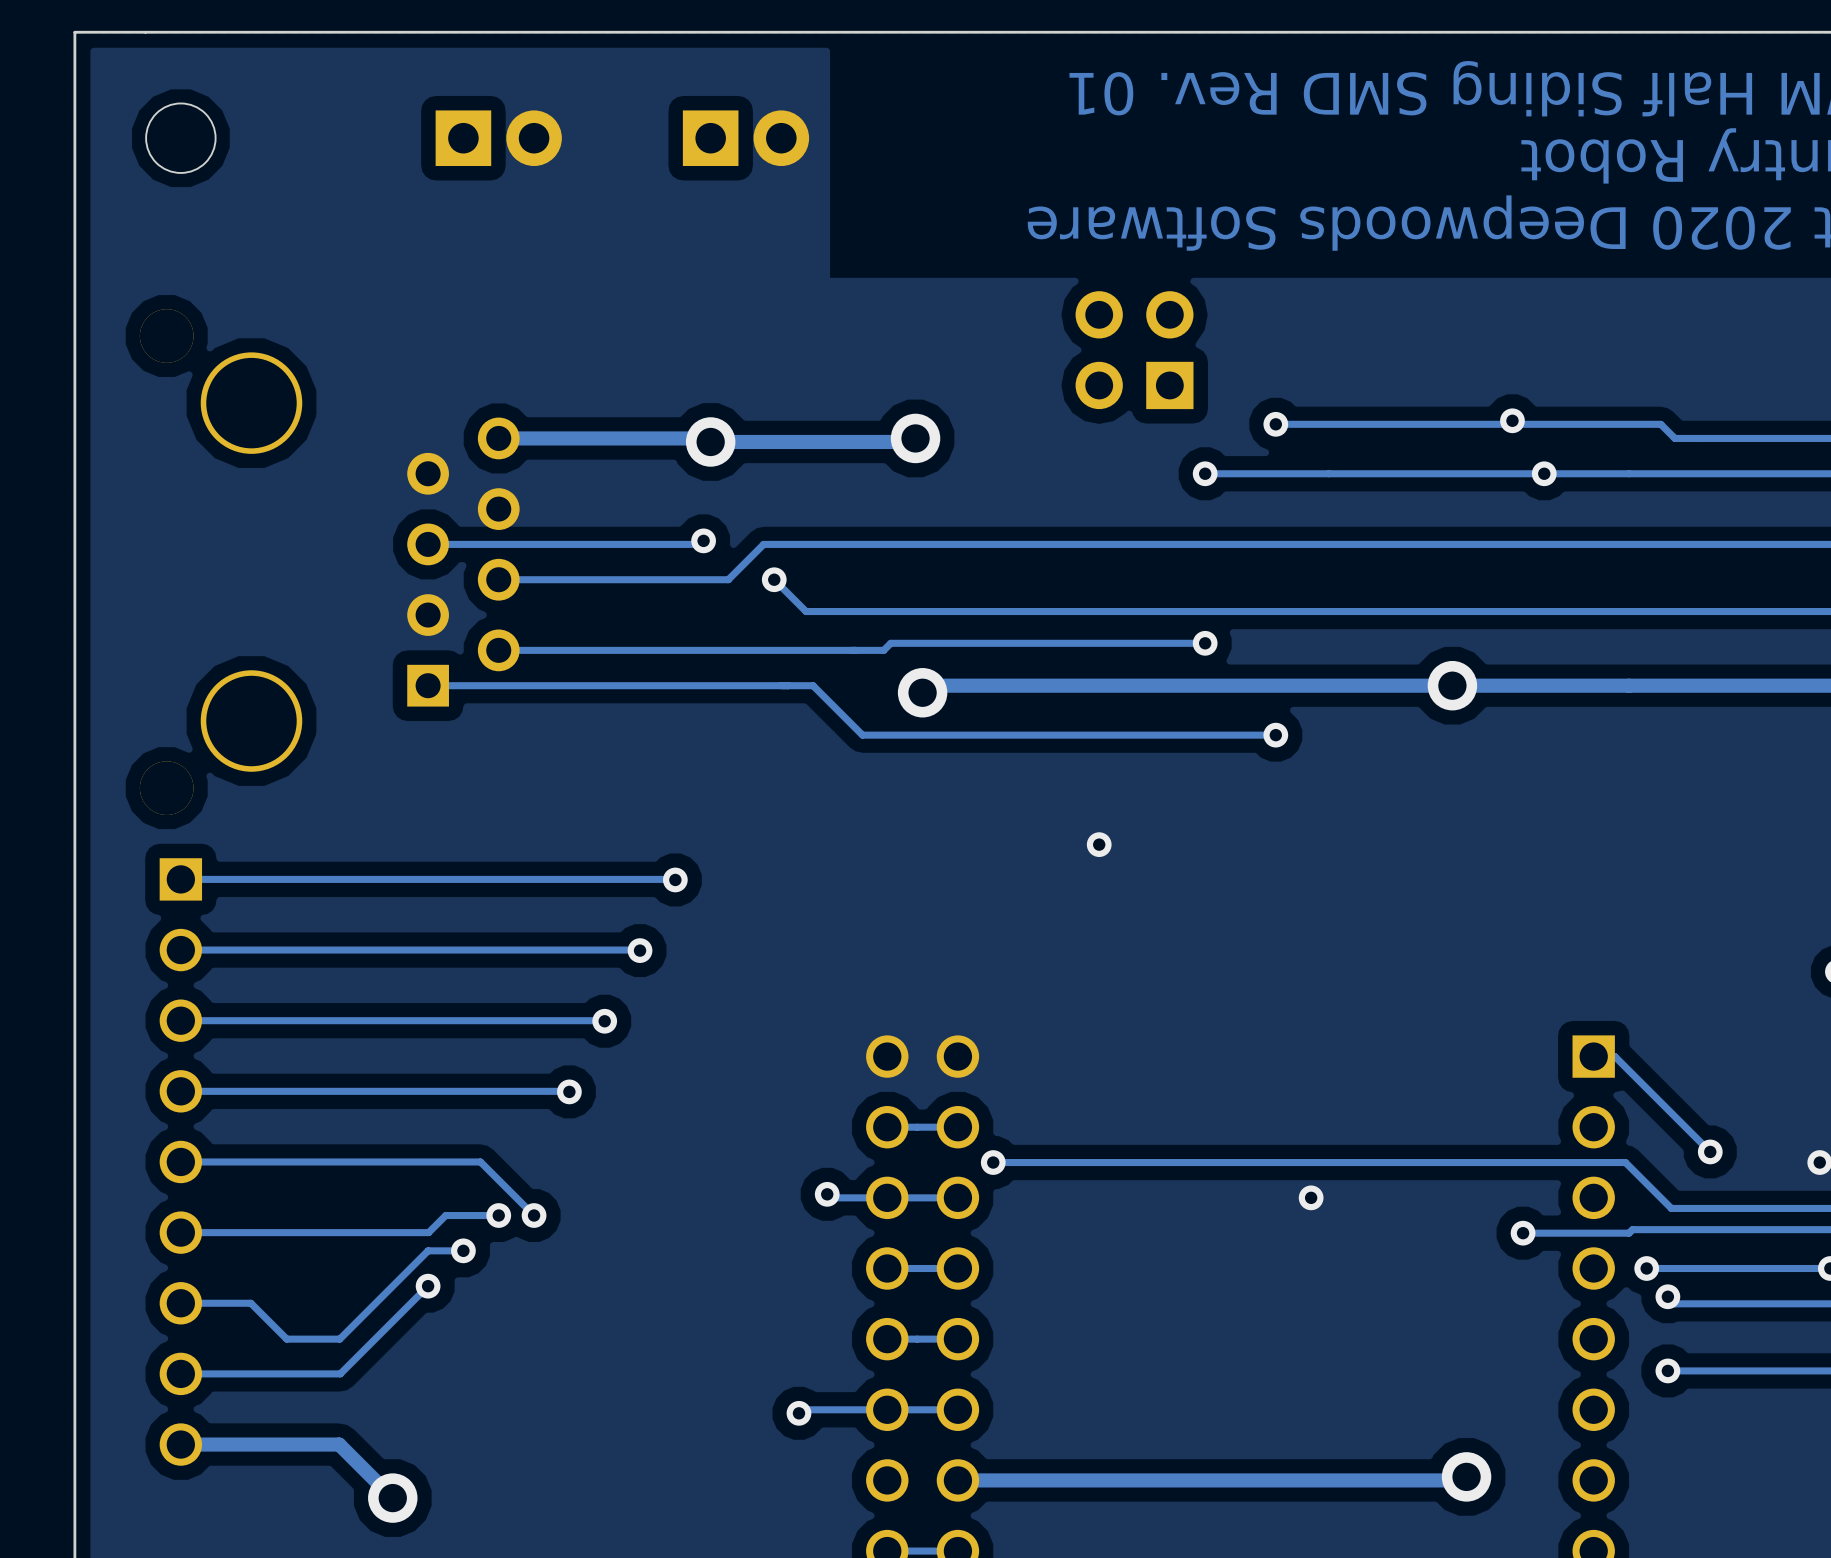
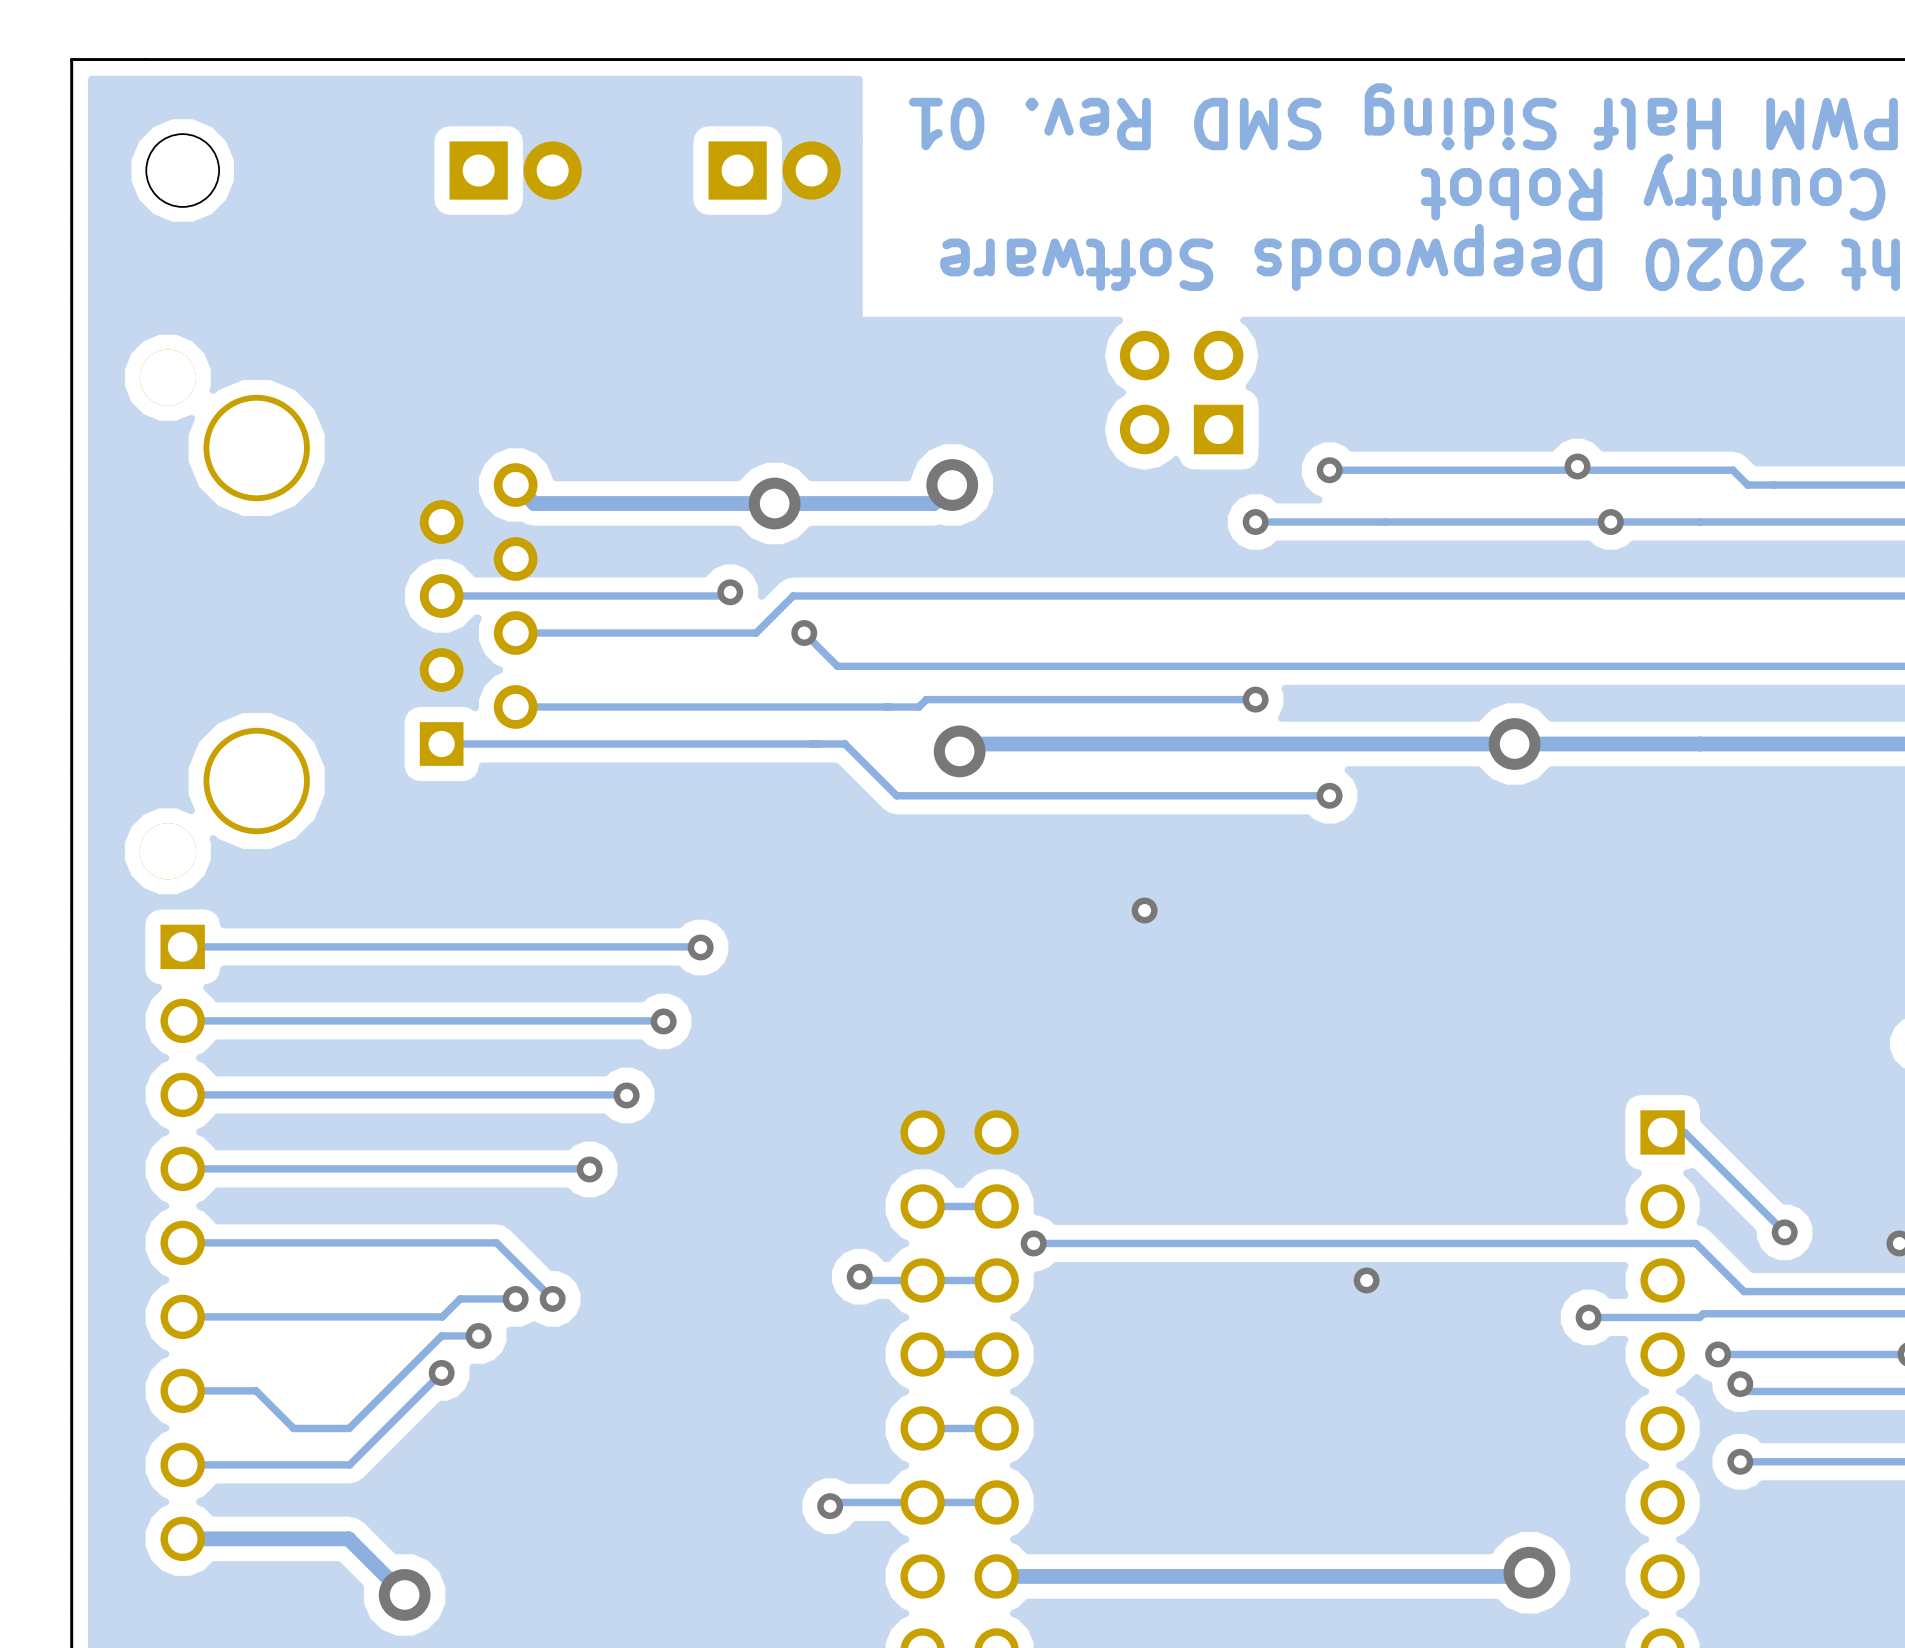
track: (498, 438) (707, 438) (710, 441) -> (515, 485) (534, 503) (933, 503) (948, 488)
via position: (710, 441) -> (774, 503)
track: (912, 441) (710, 441) -> none

